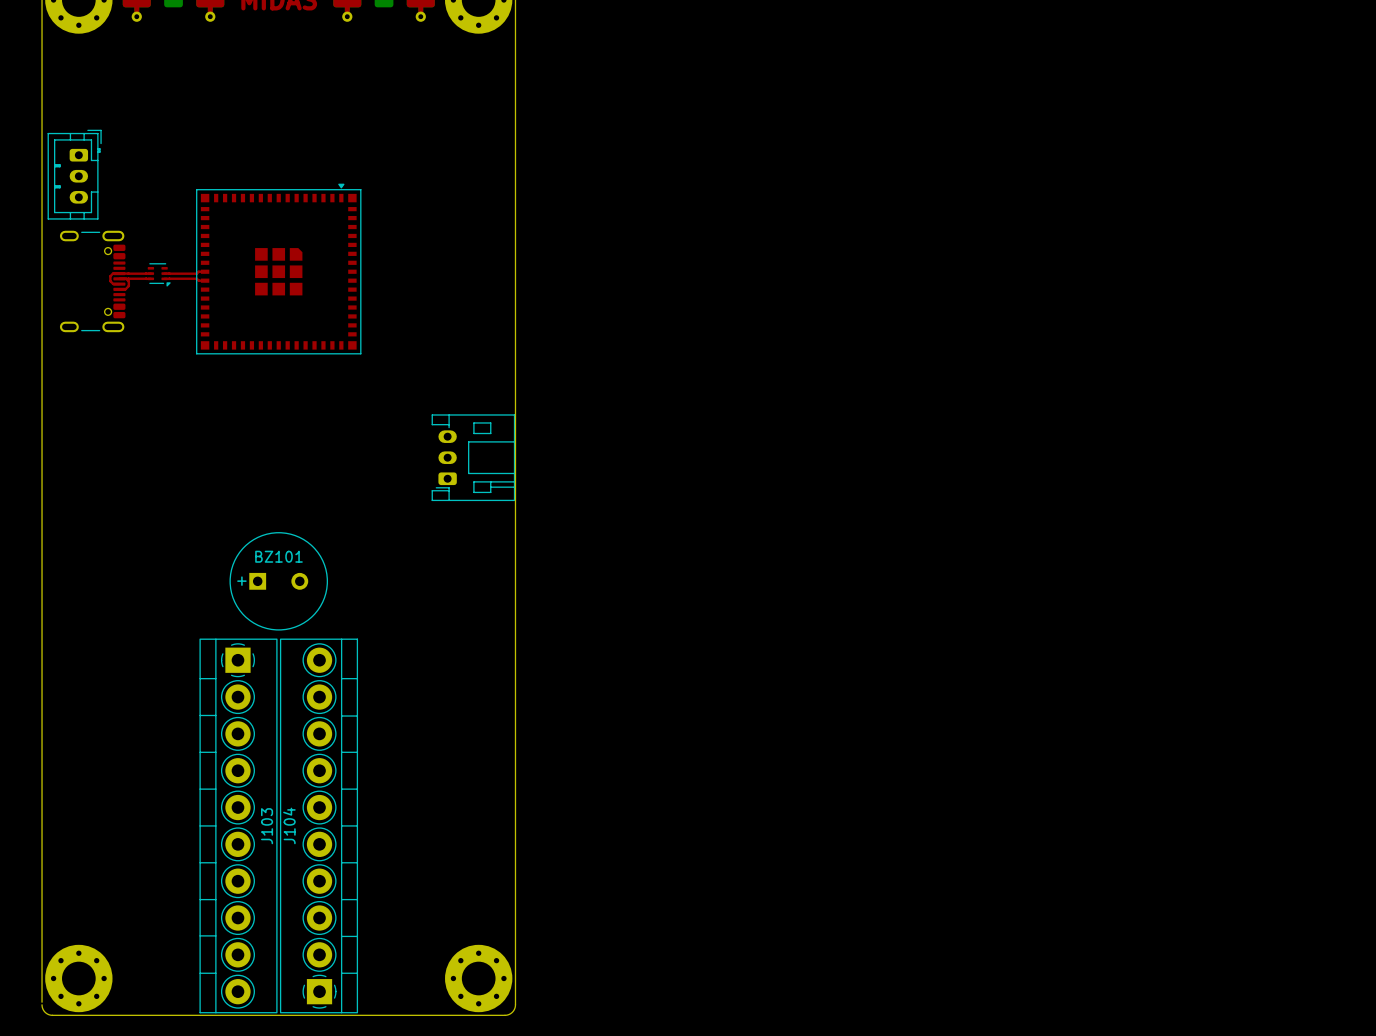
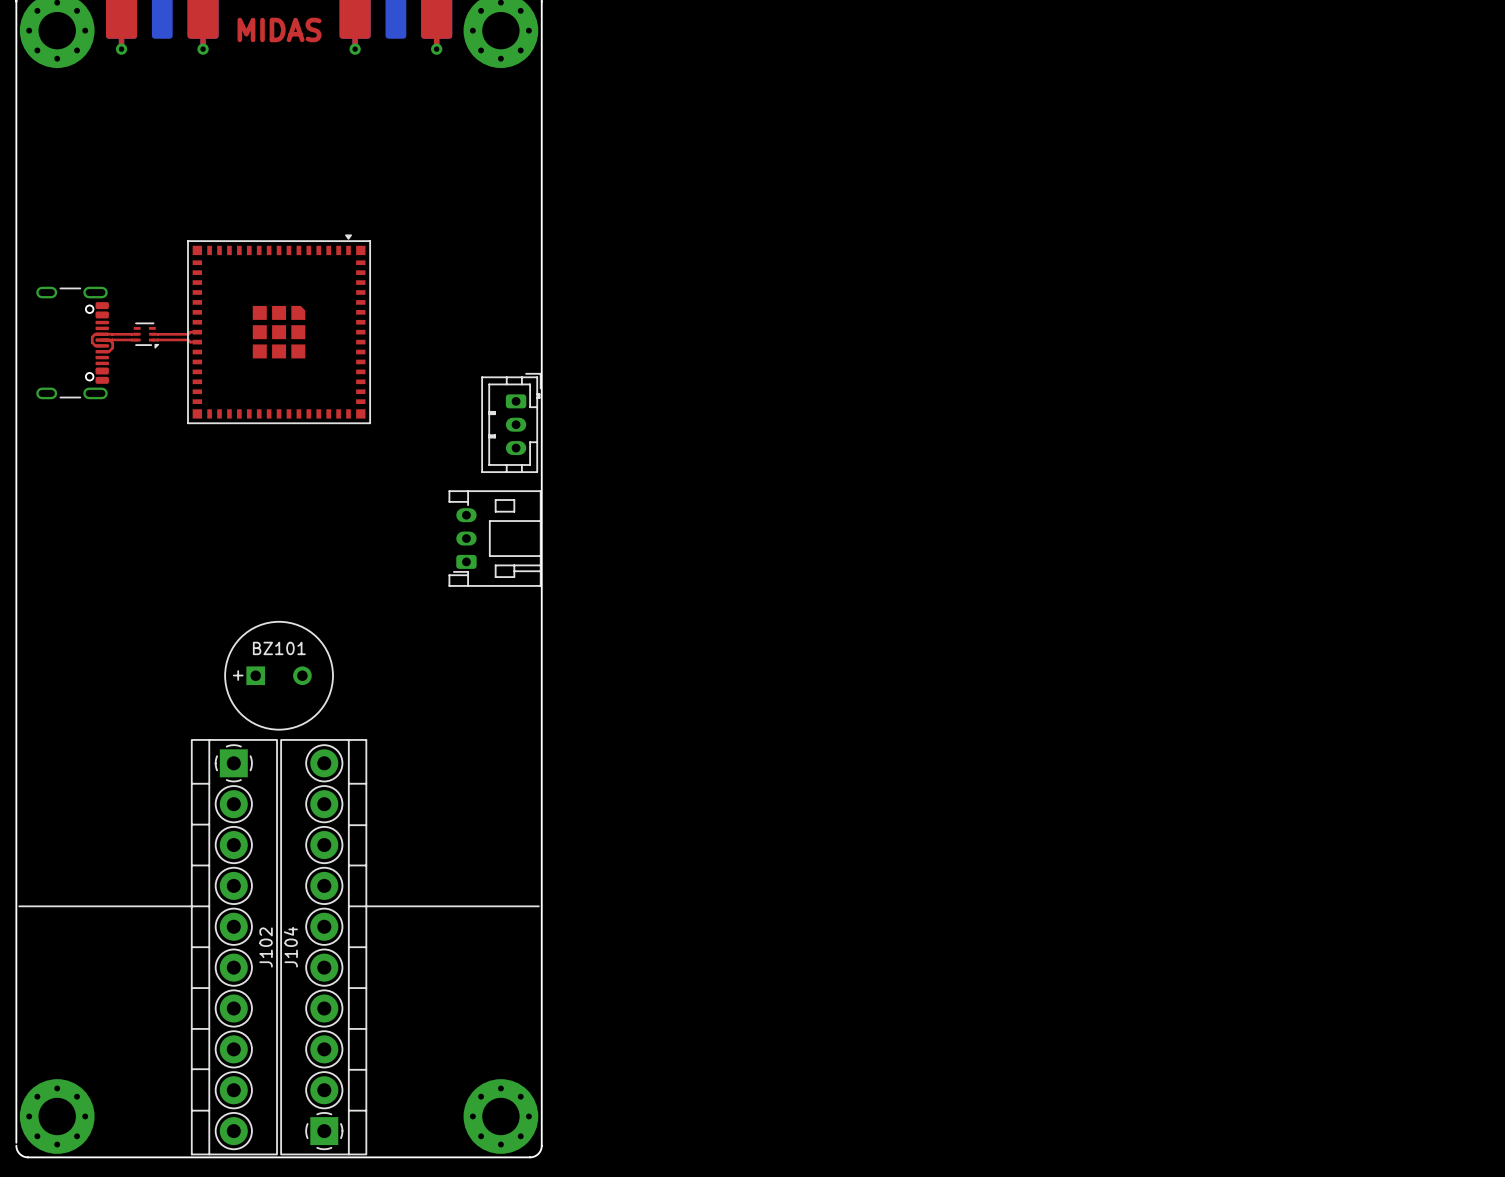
part: (74, 174) -> none
part: none -> (511, 422)
line: none -> (19, 906) (191, 906)
line: none -> (366, 906) (538, 906)
J103 name: J103 (267, 826) -> J102 (266, 947)

